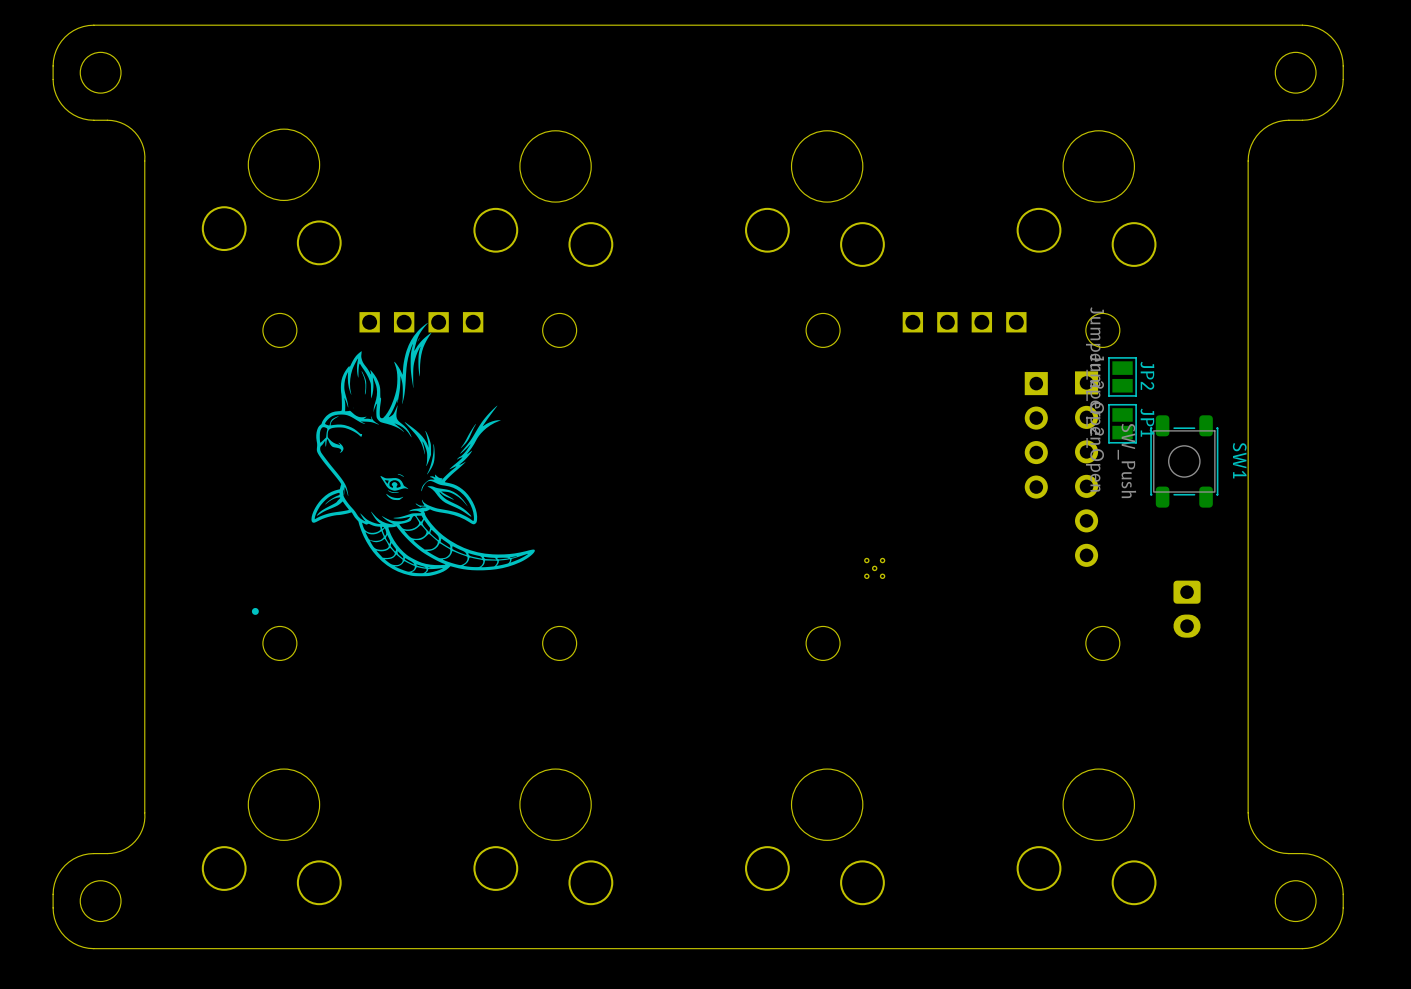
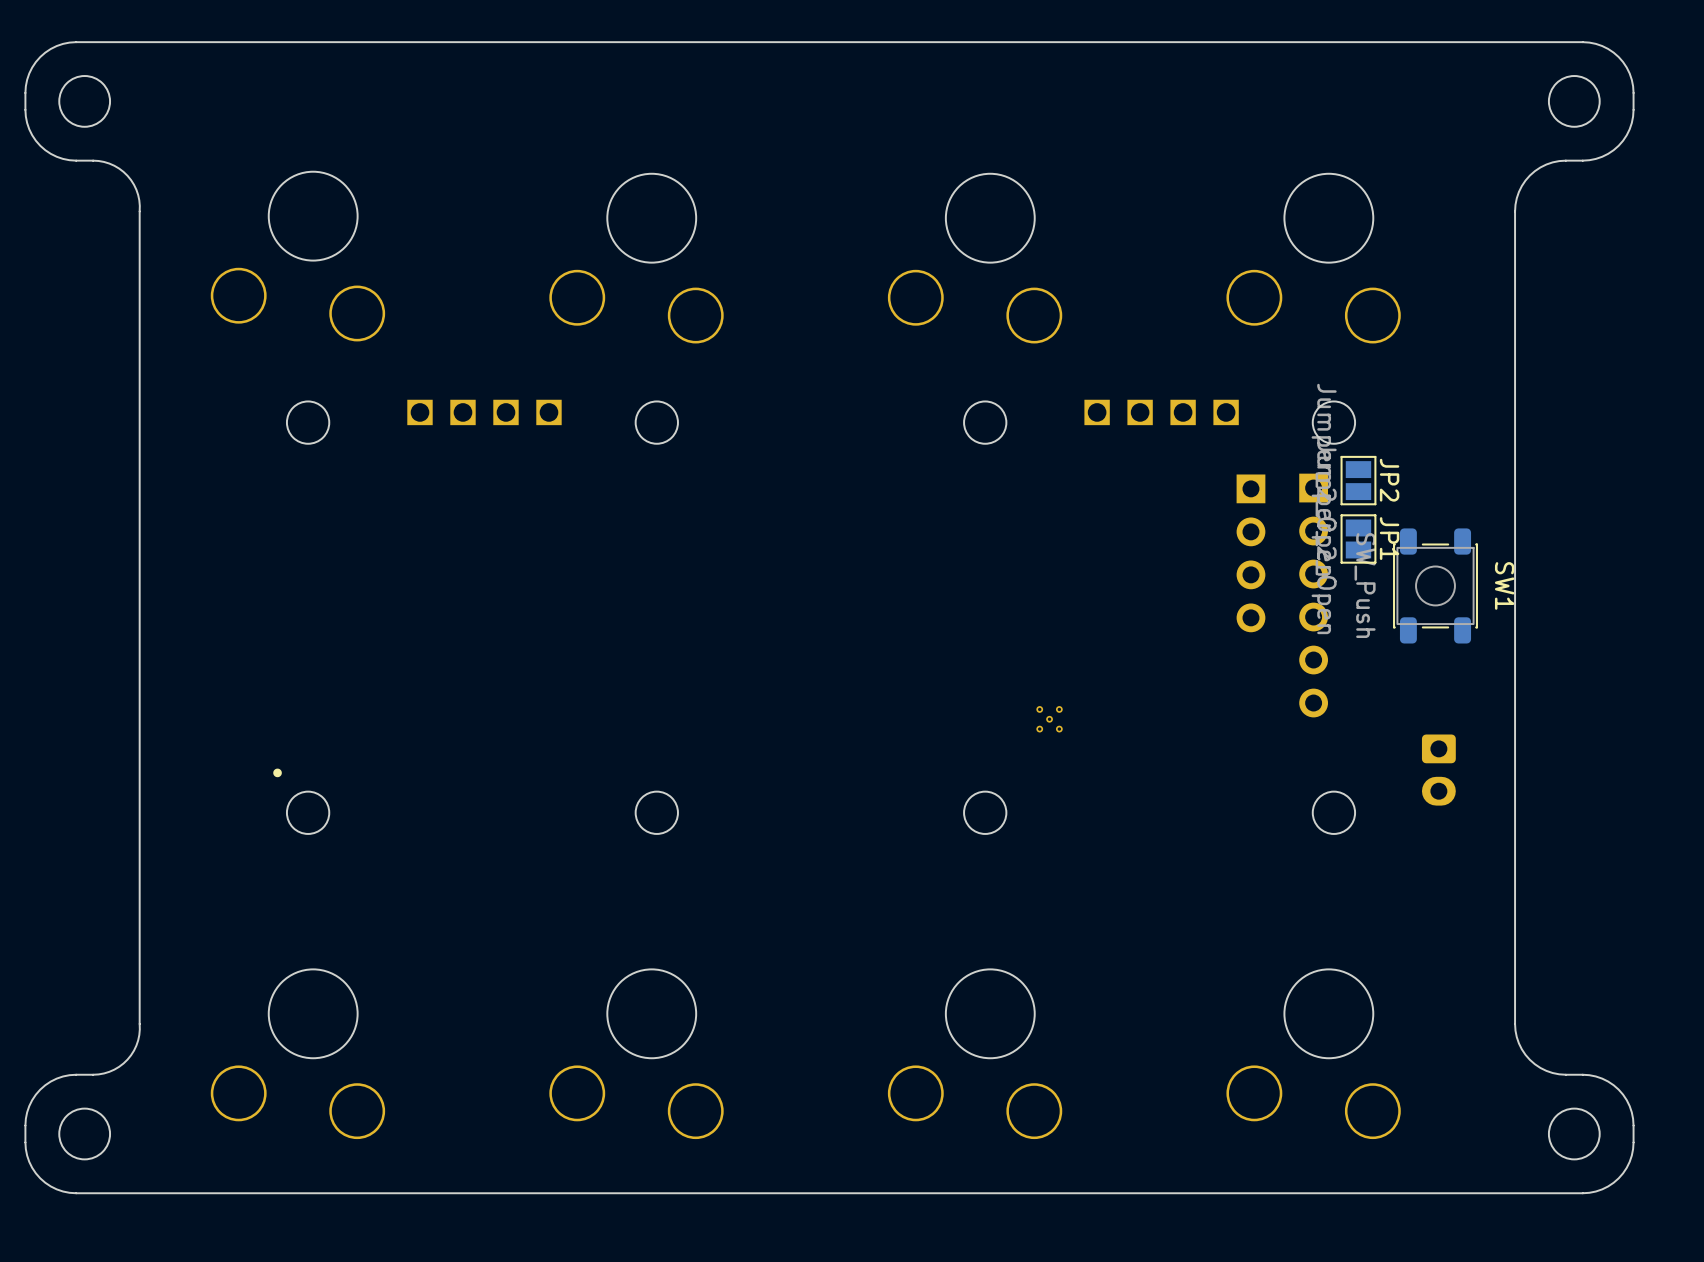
drawing: [311, 322, 535, 577] -> none

